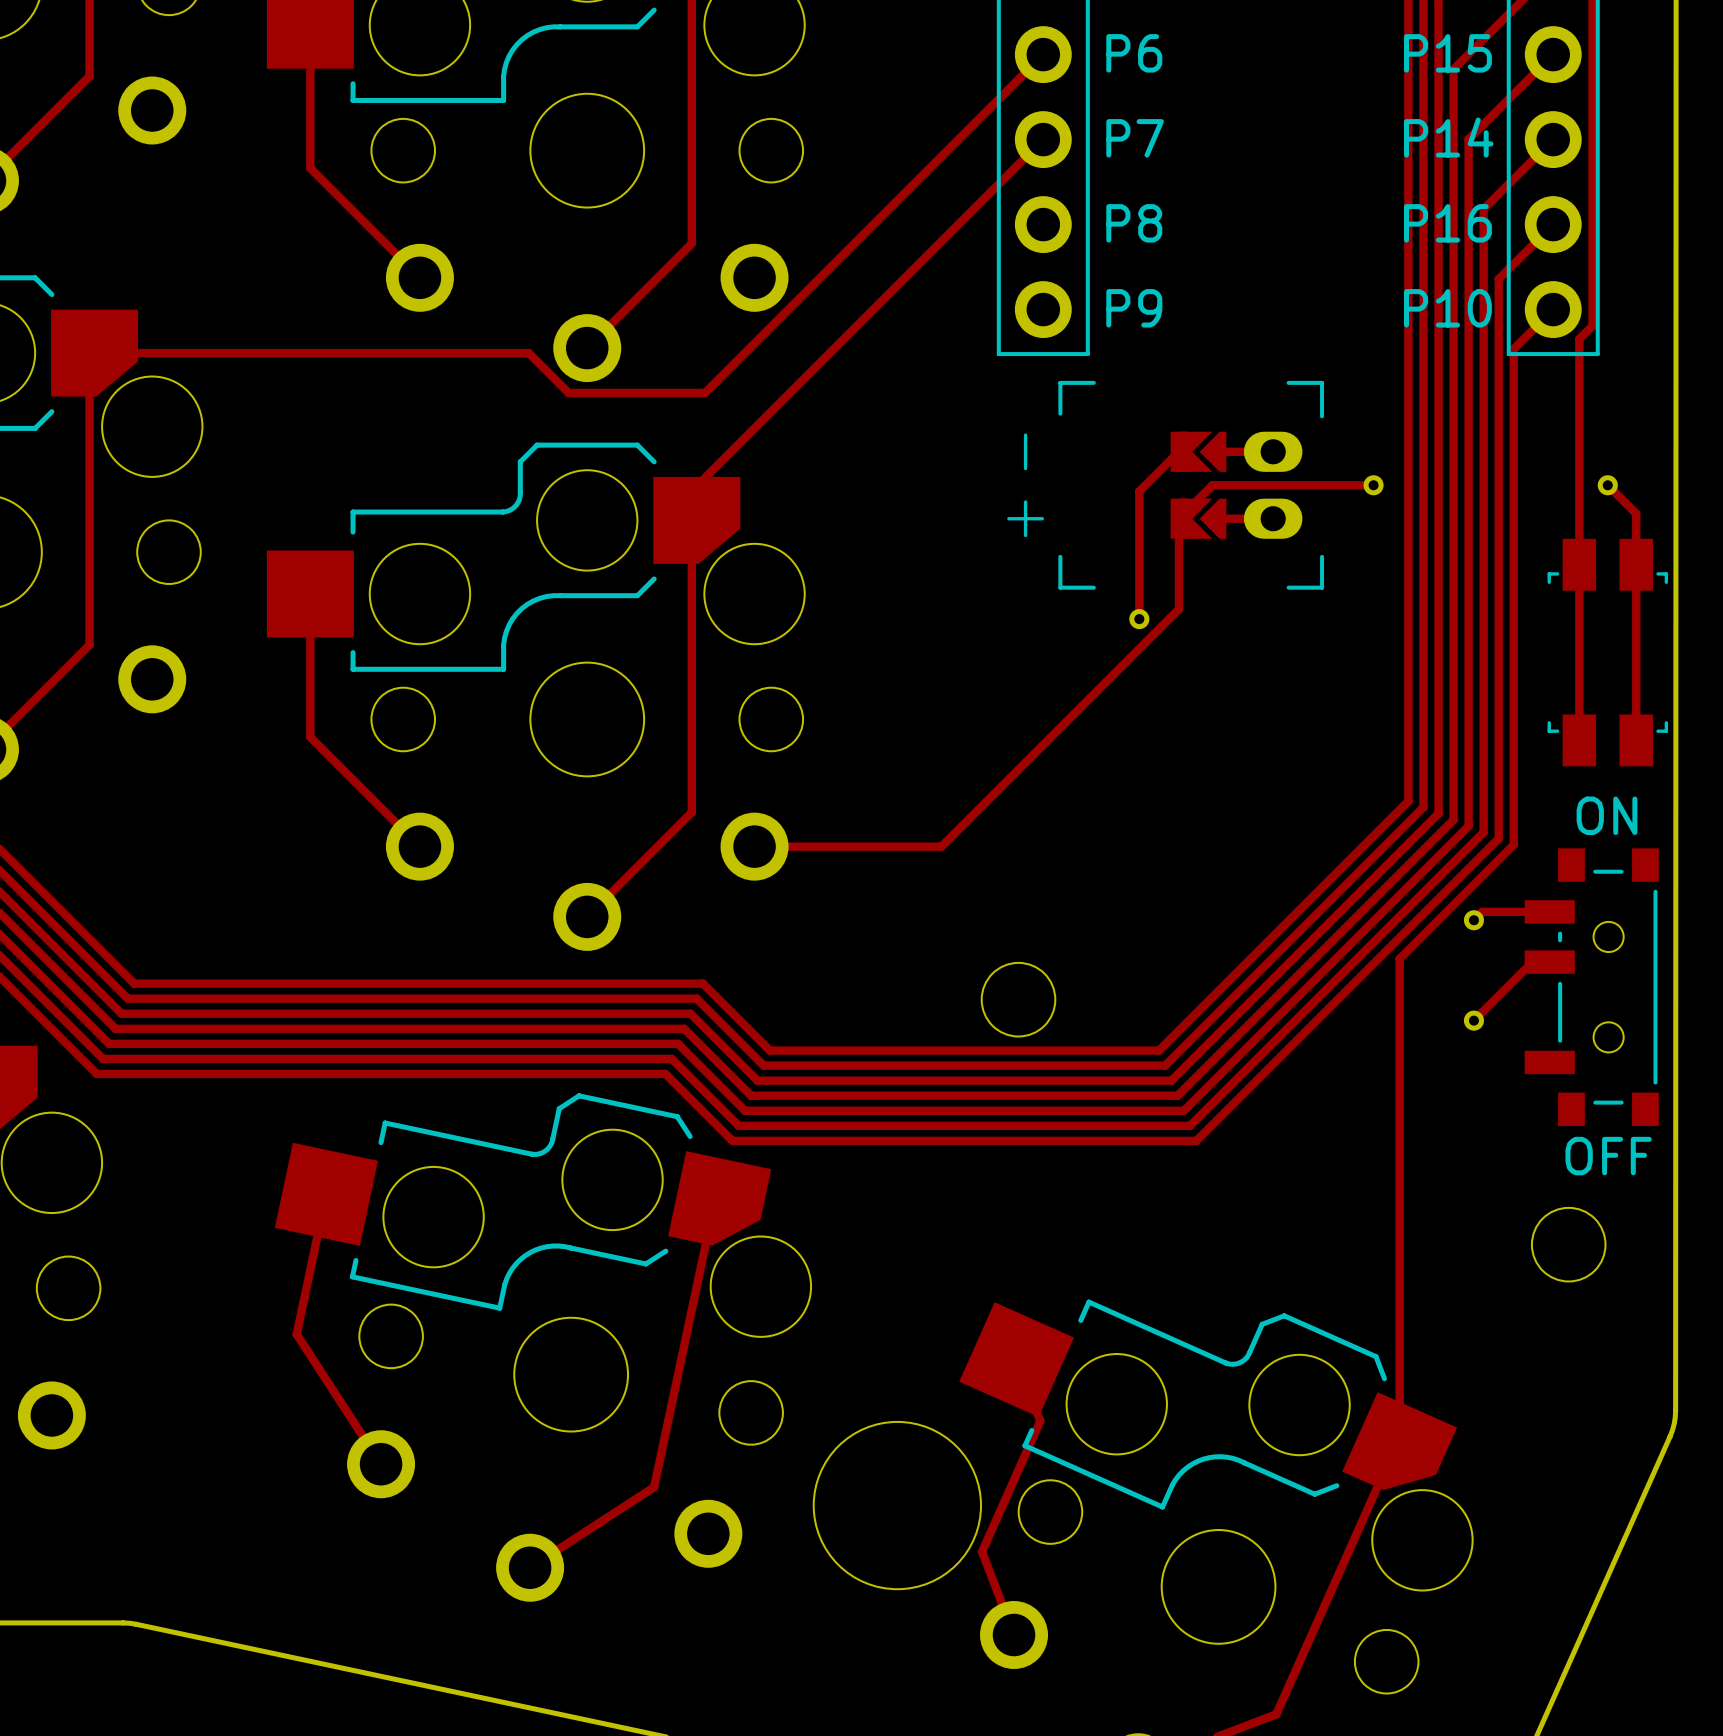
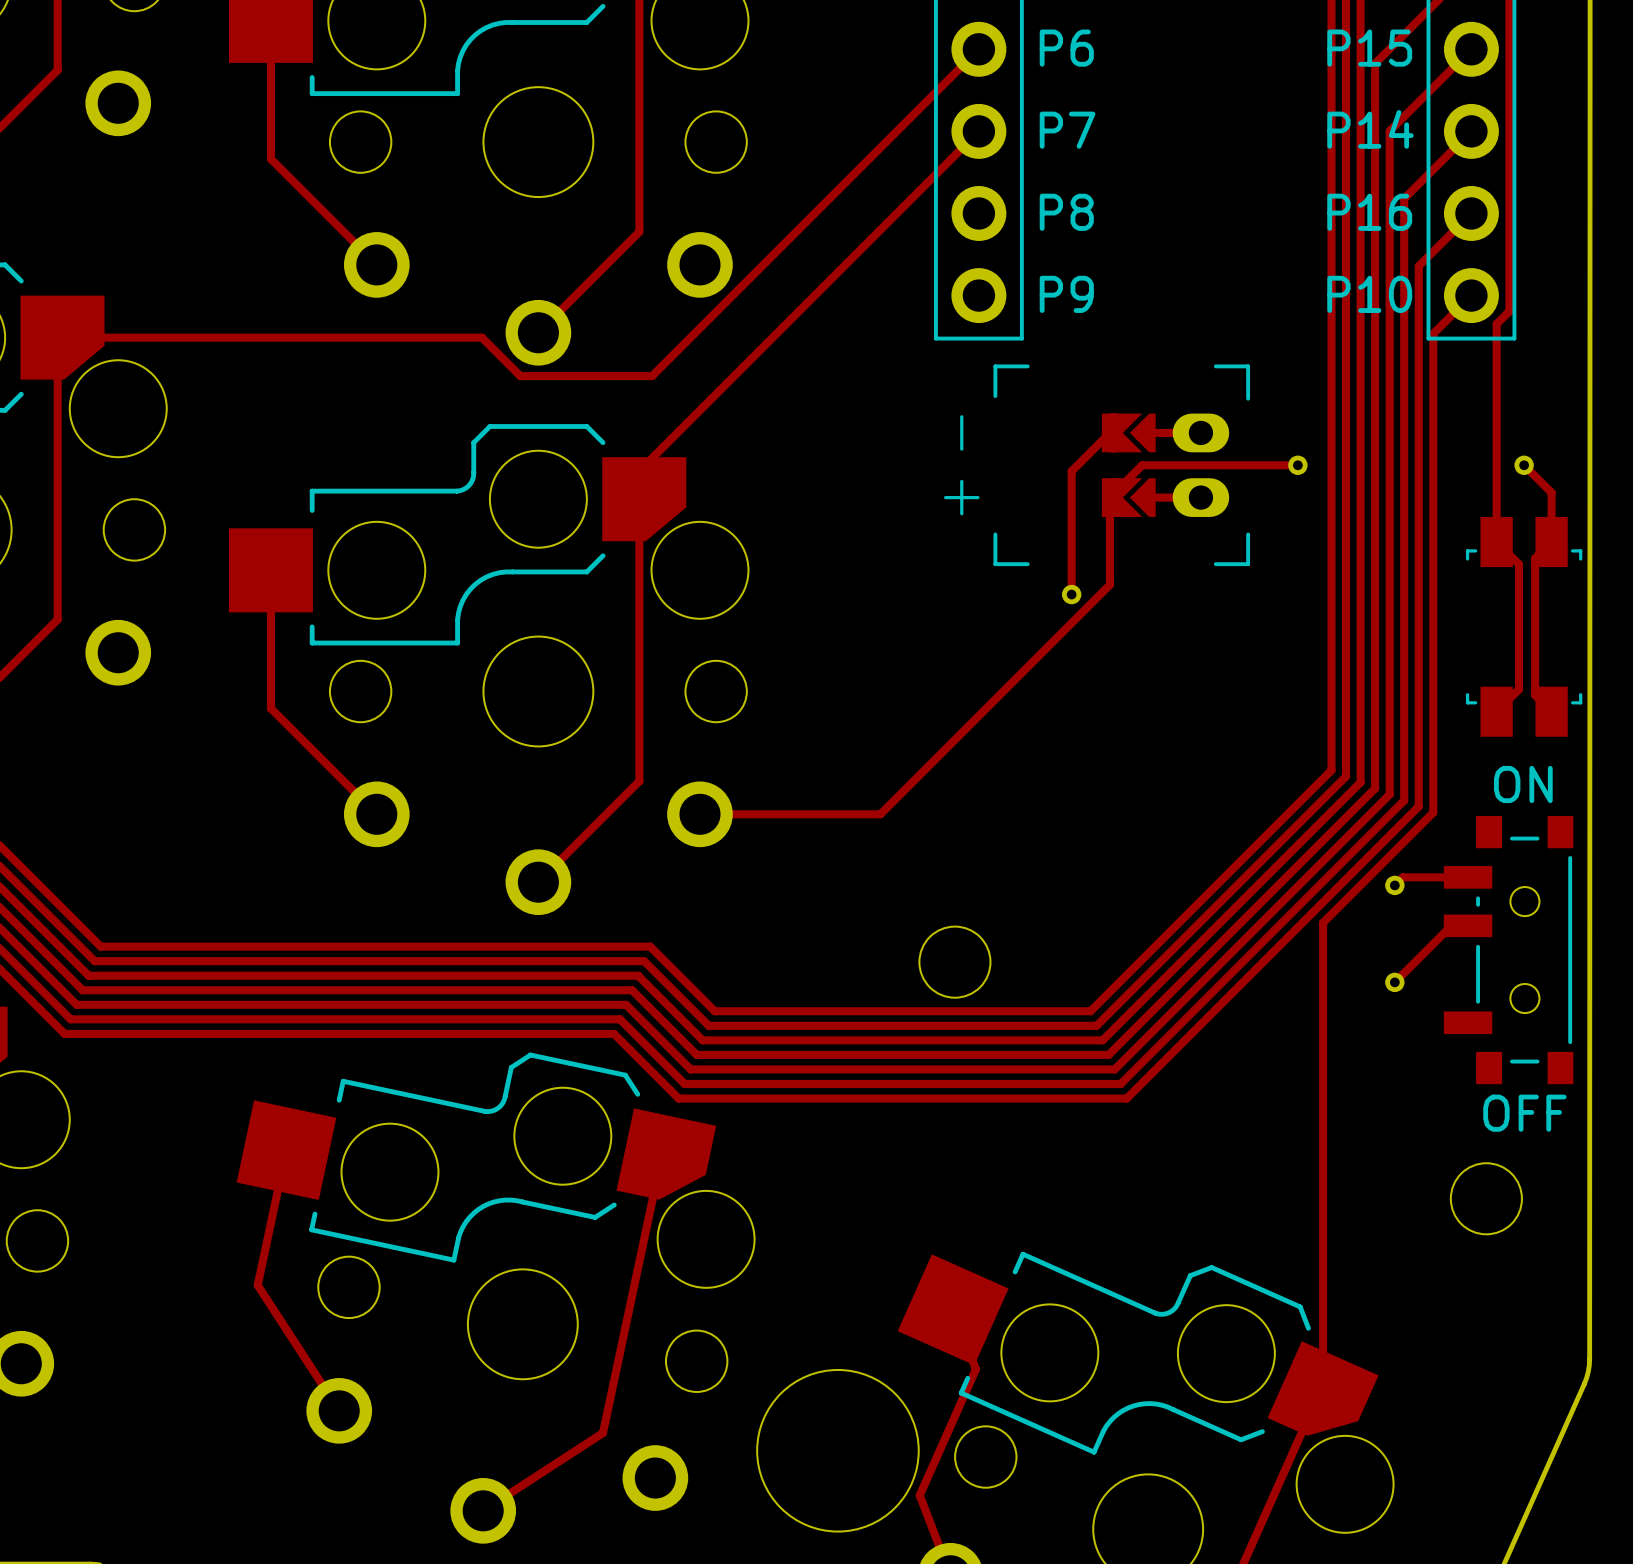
track: (1579, 564) (1579, 740) -> (1496, 542) (1518, 564) (1518, 689) (1496, 711)
track: (1636, 564) (1636, 740) -> (1551, 542) (1535, 558) (1535, 695) (1551, 711)

